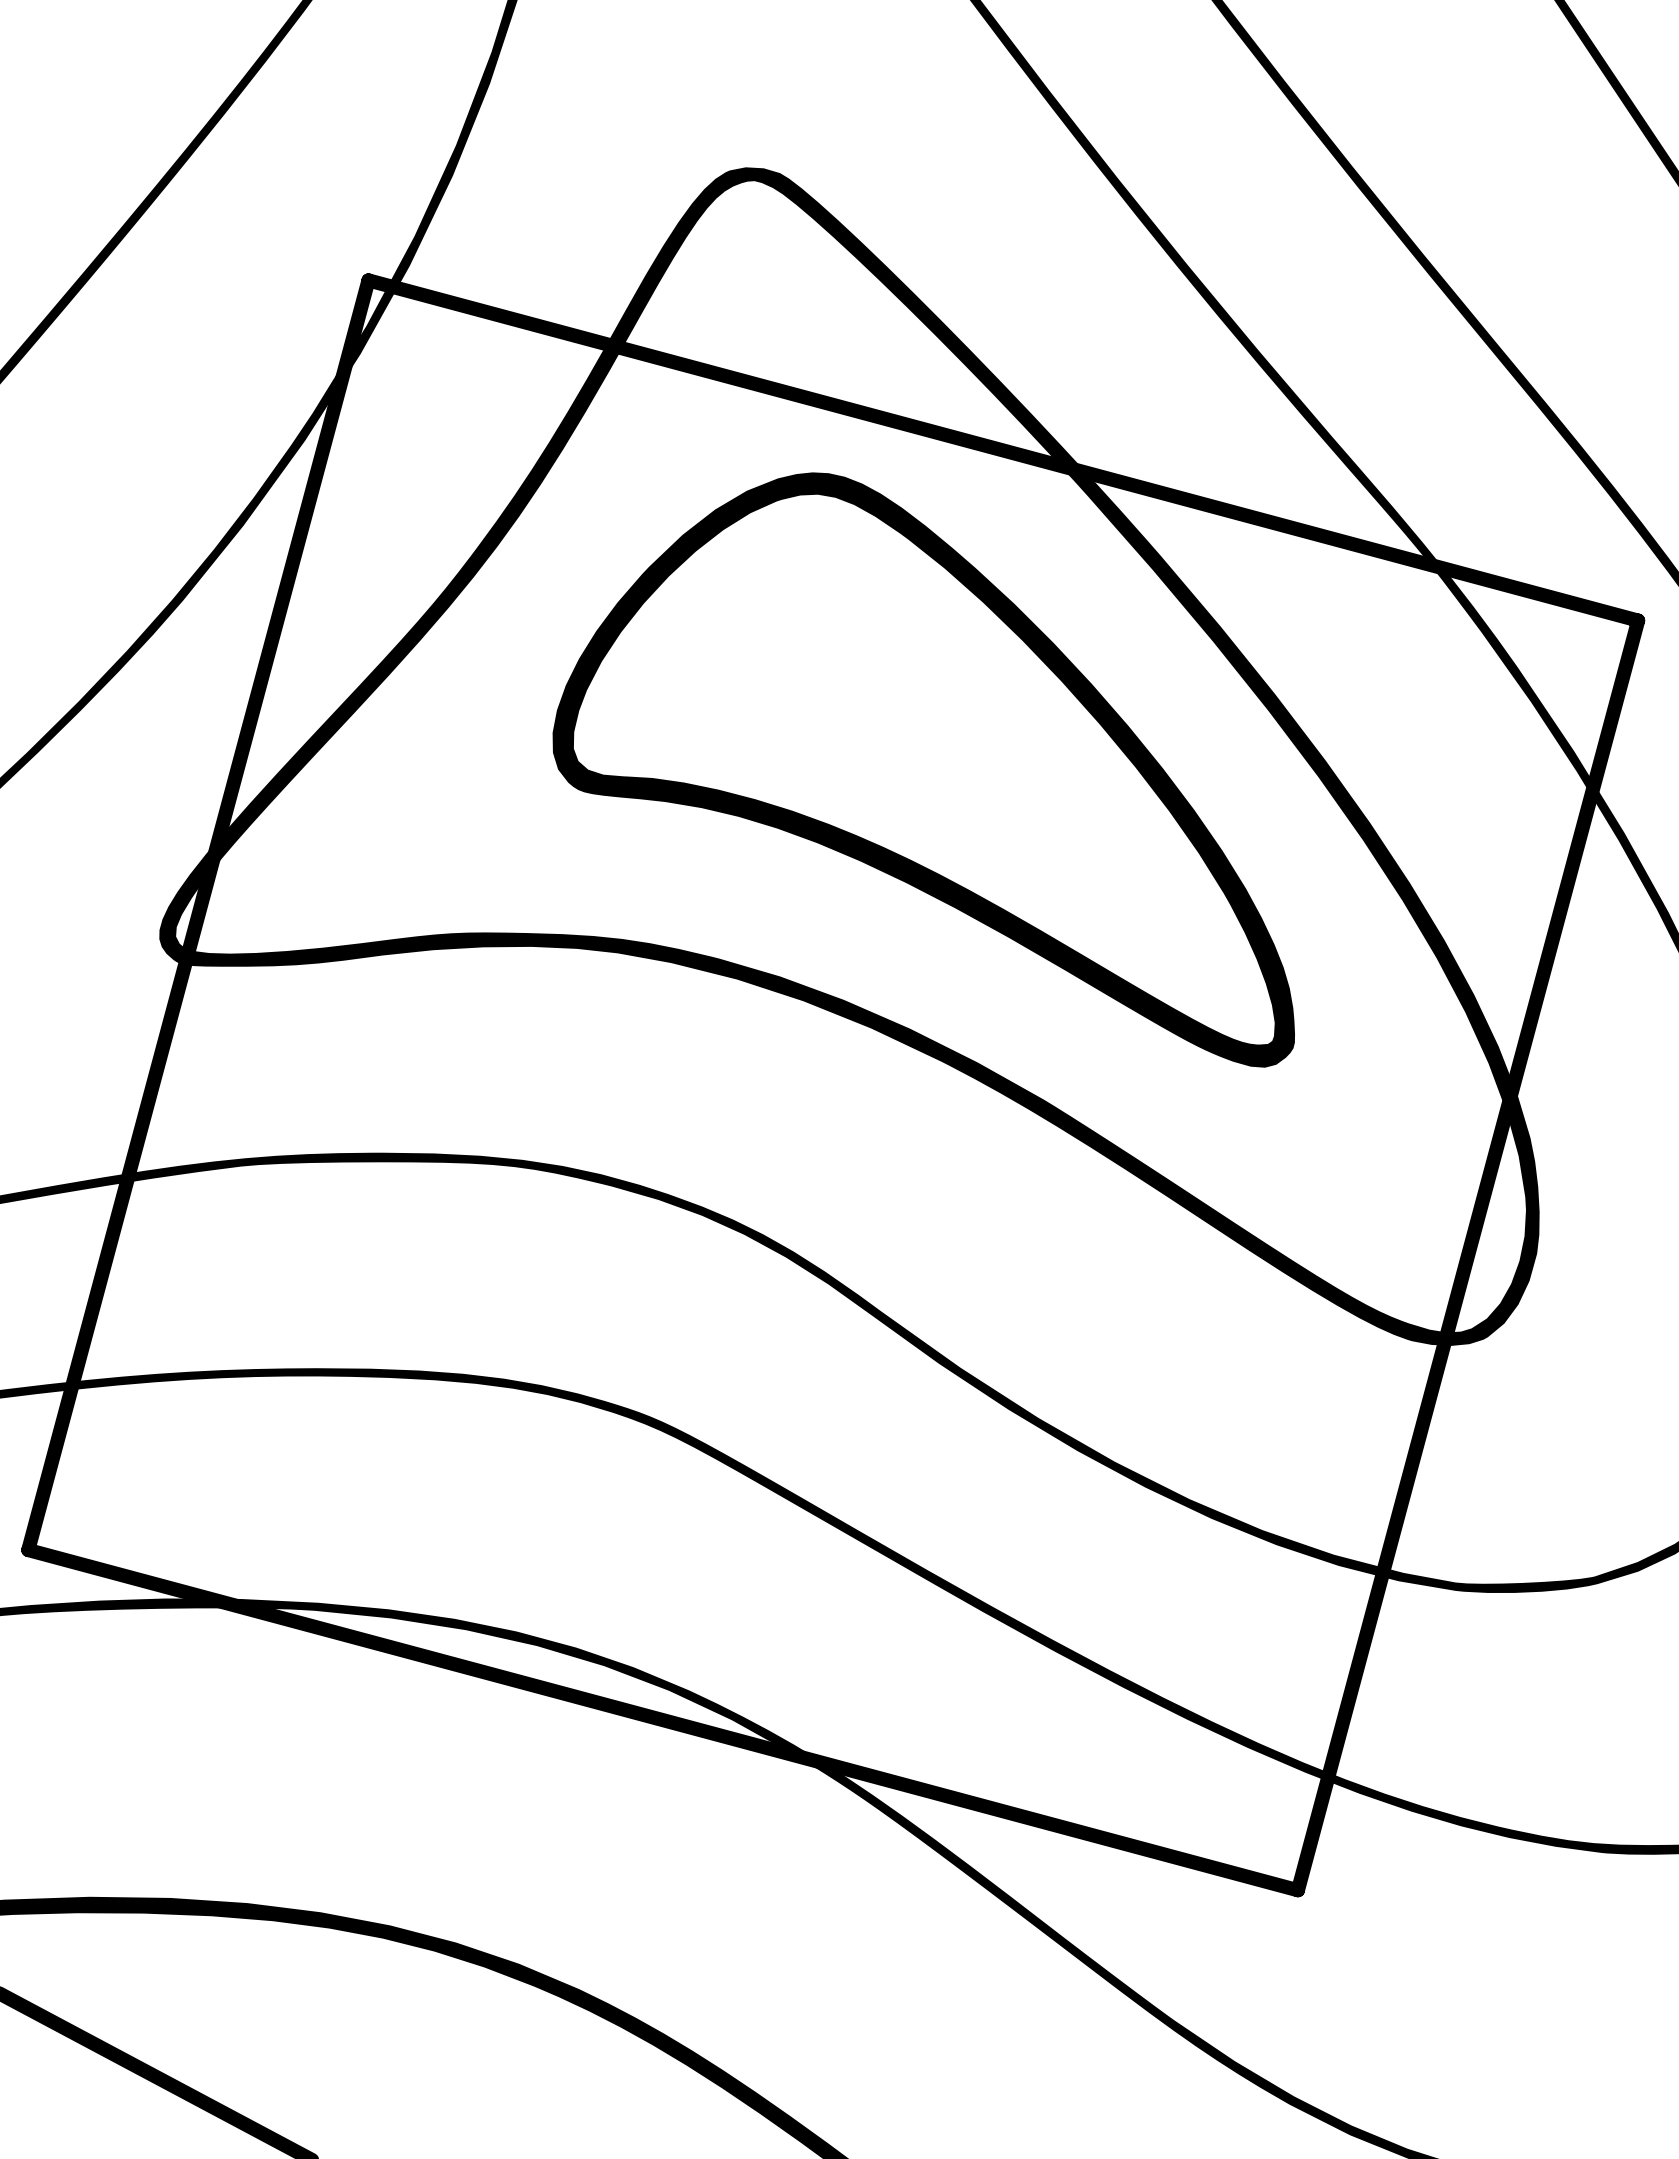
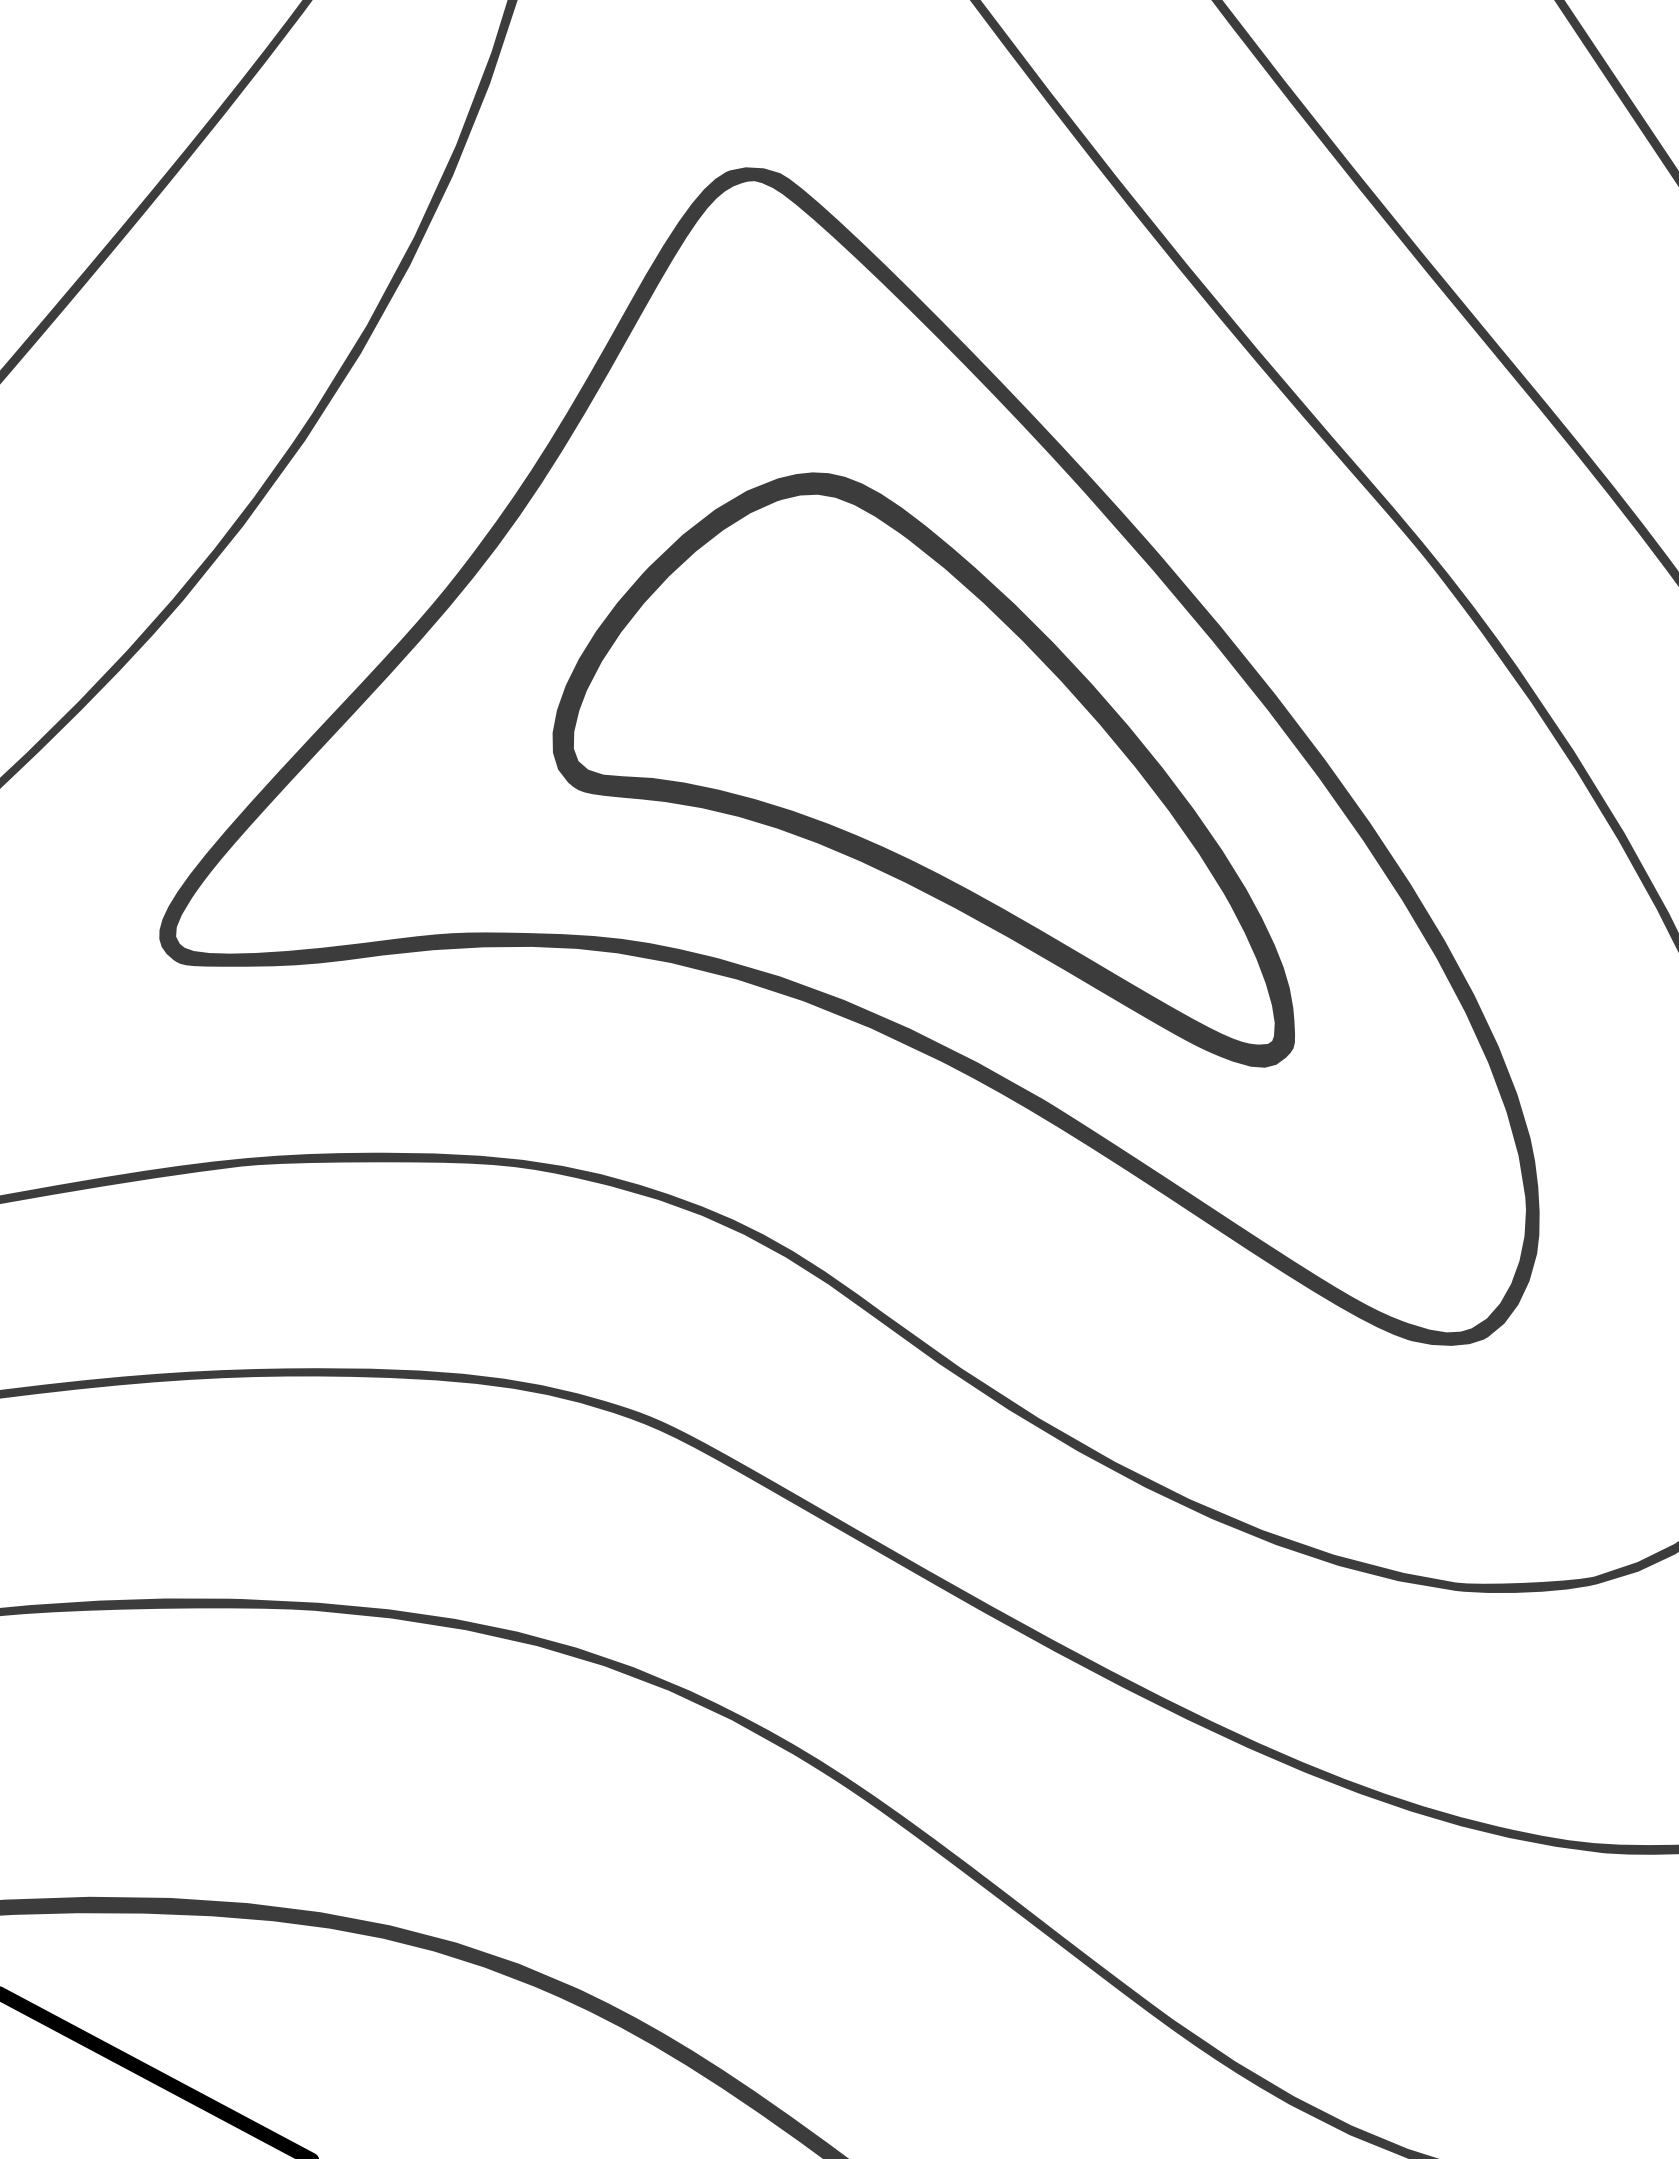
board edge: (368, 280) (1638, 620) (1297, 1890) (28, 1550) (368, 280) -> none

